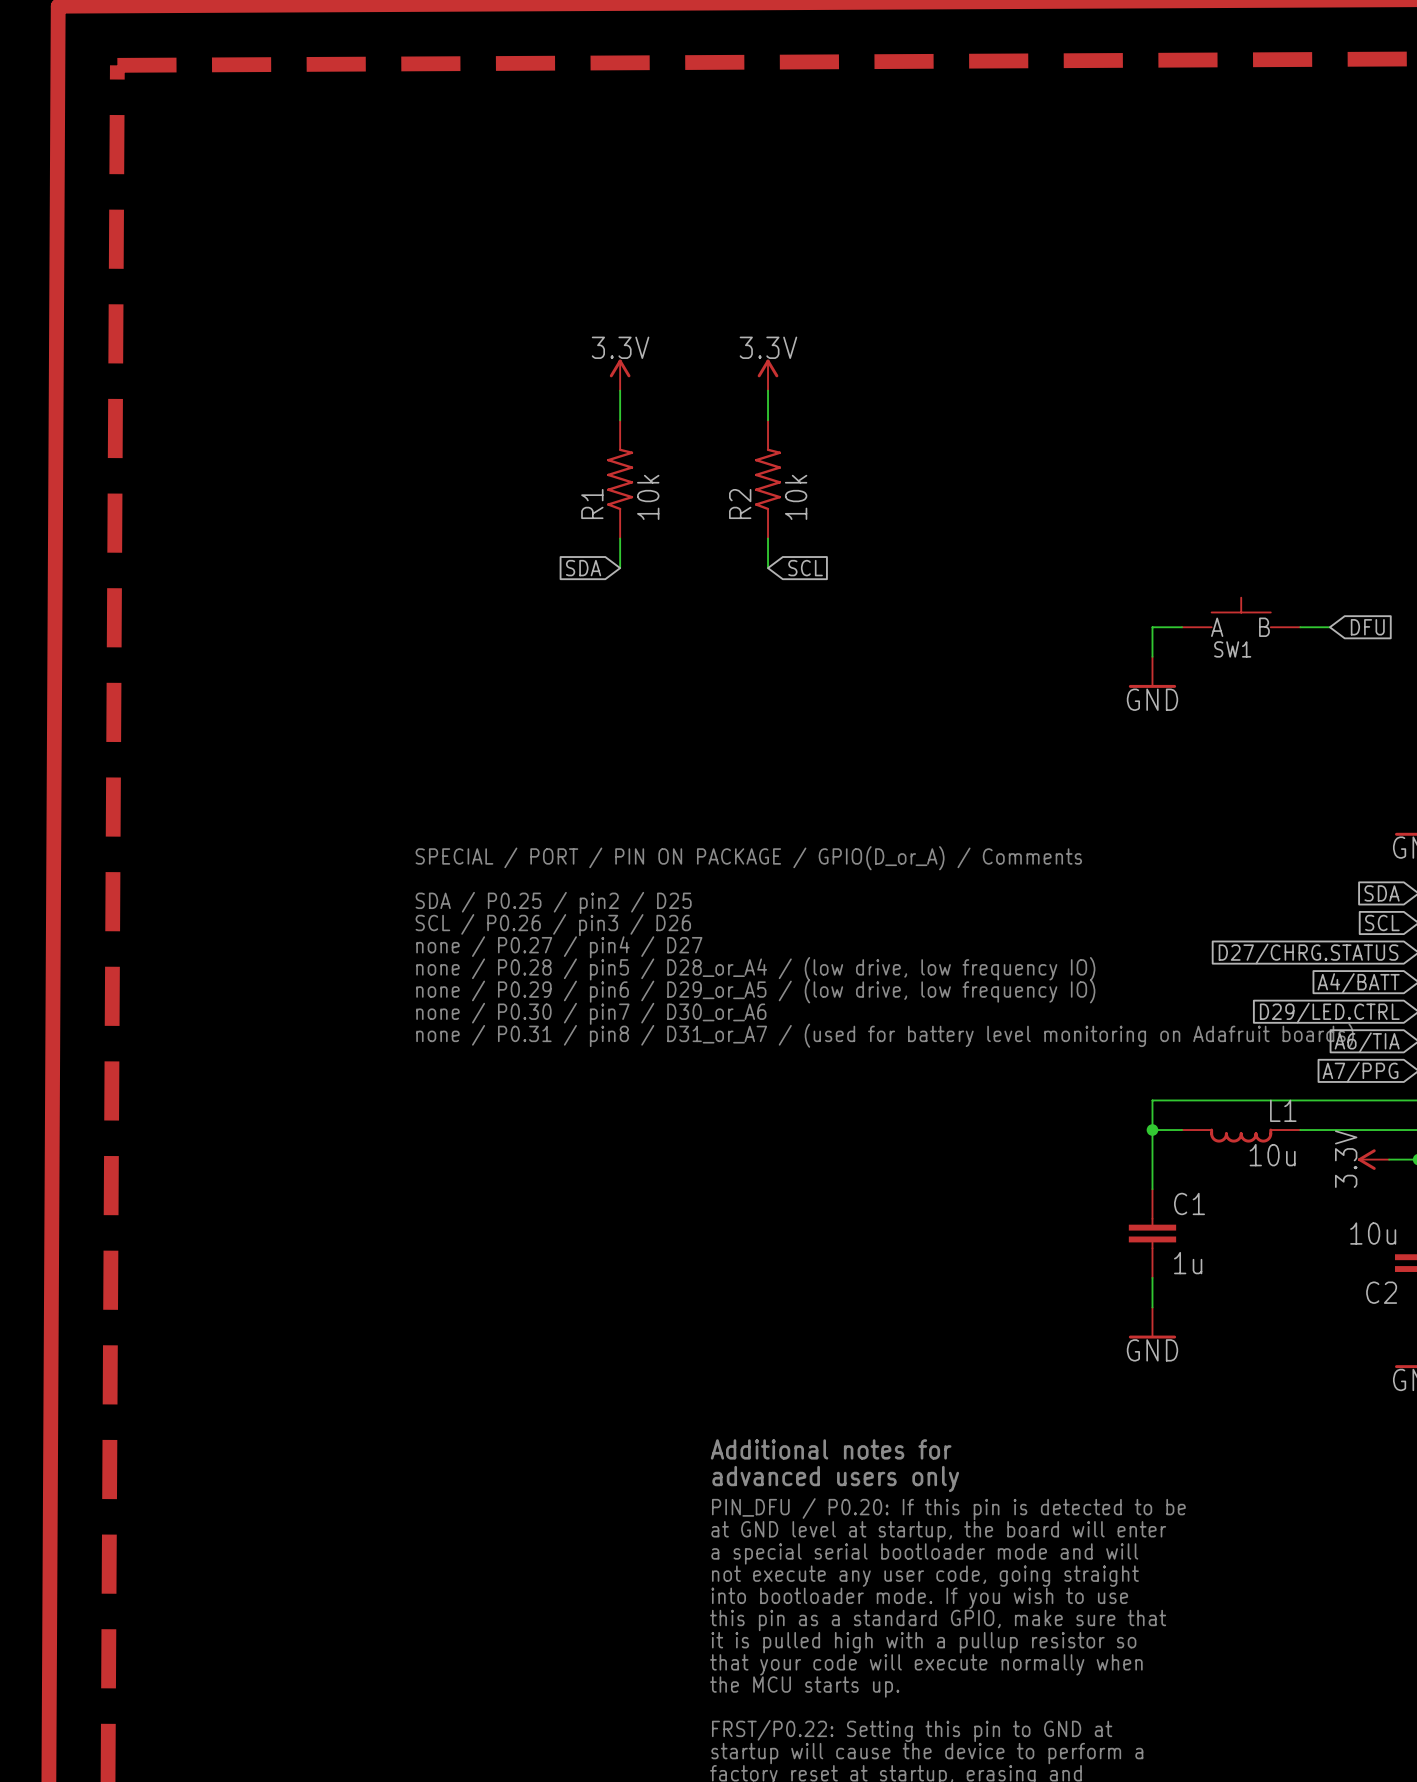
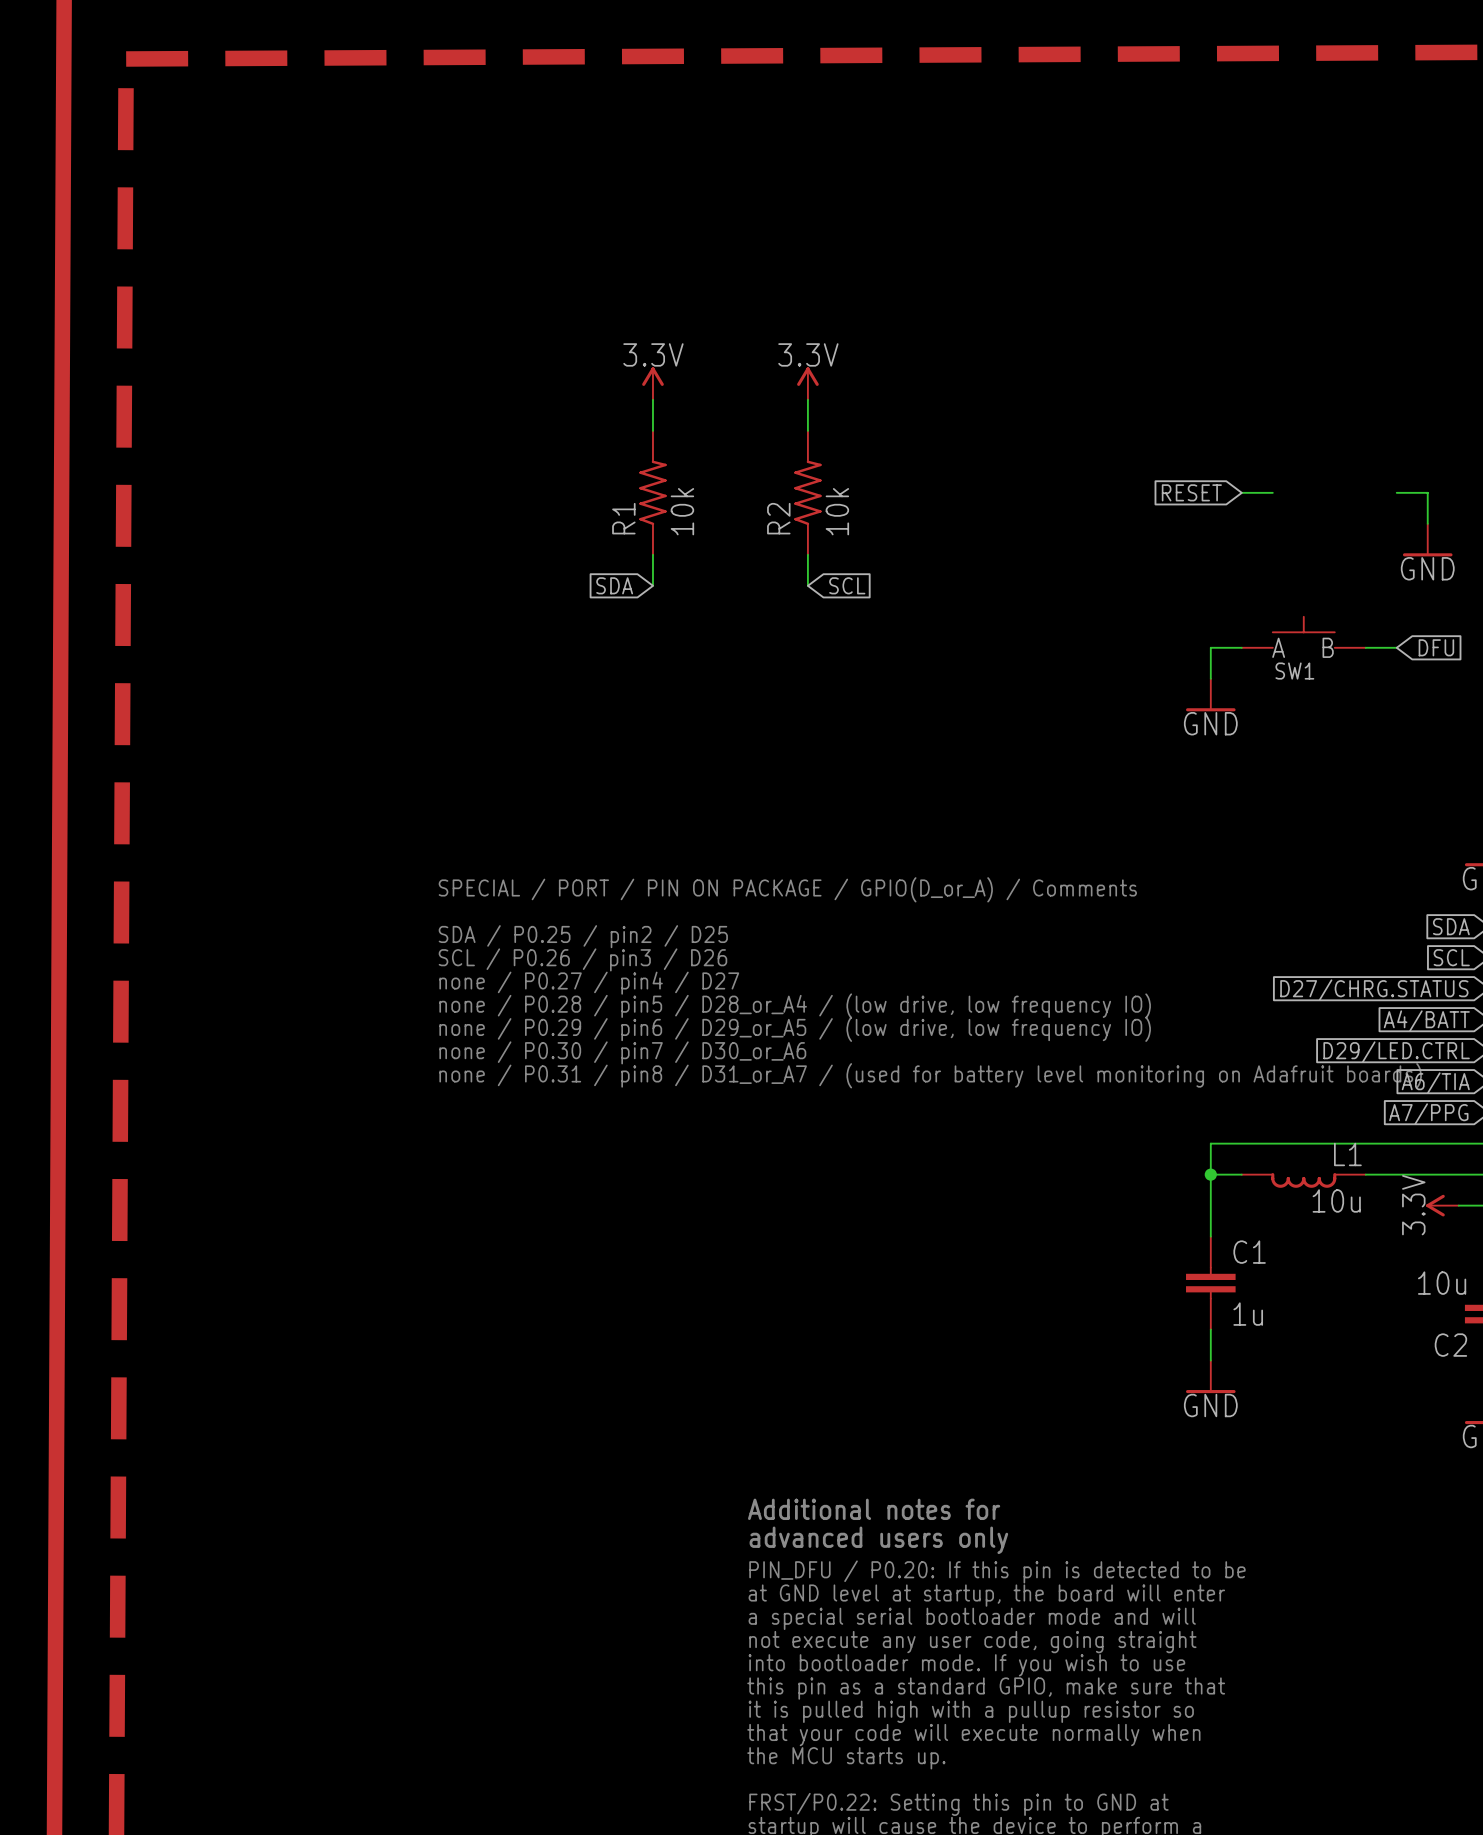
global label: none -> RESET (1191, 492)
wire: none -> (1241, 492) (1272, 492)
wire: none -> (1396, 492) (1427, 492) (1427, 523)
power symbol: none -> GND (1427, 540)

